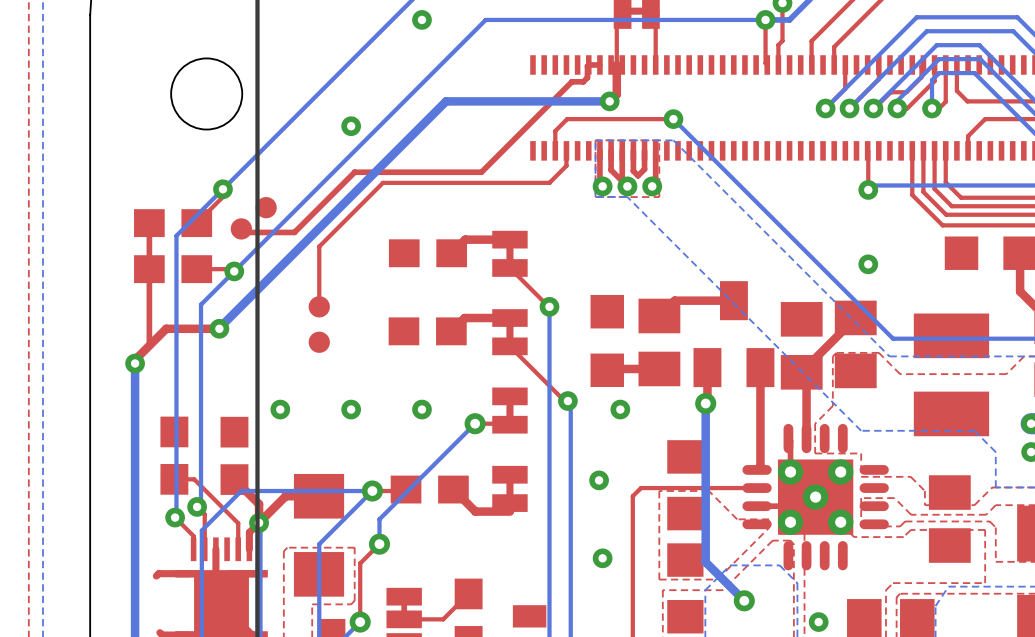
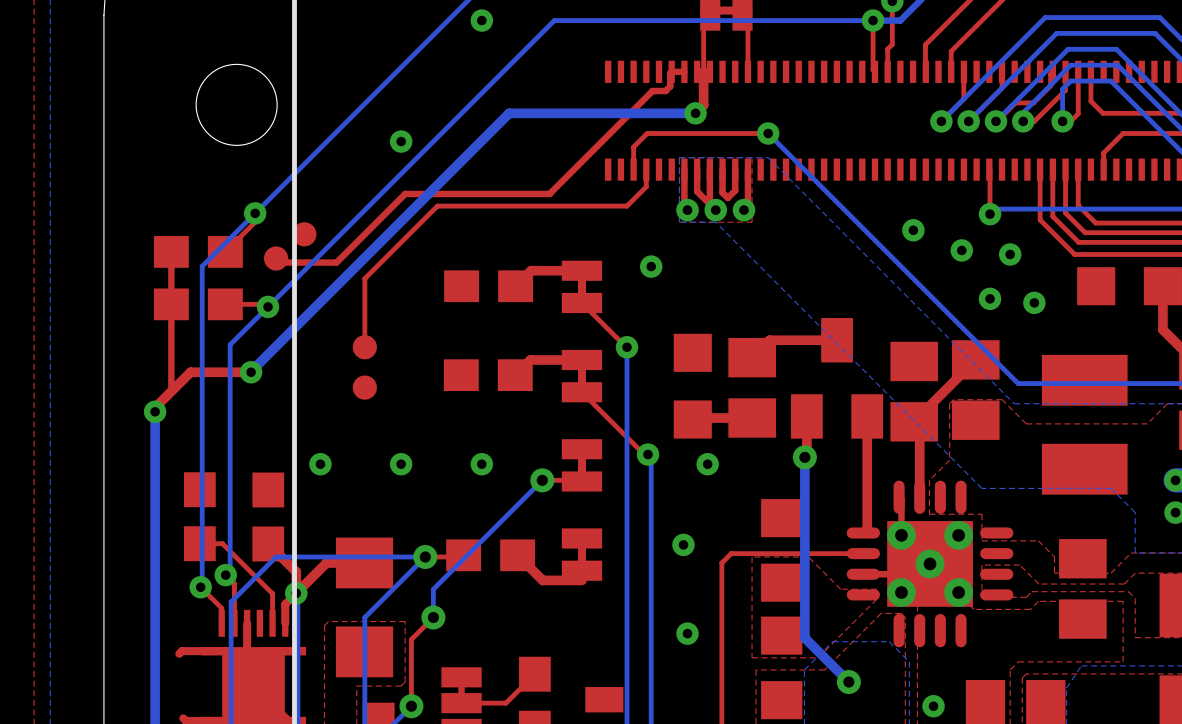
via: none -> (913, 230)
via: none -> (961, 250)
via: none -> (1010, 254)
via: none -> (651, 266)
via: none -> (1034, 302)

